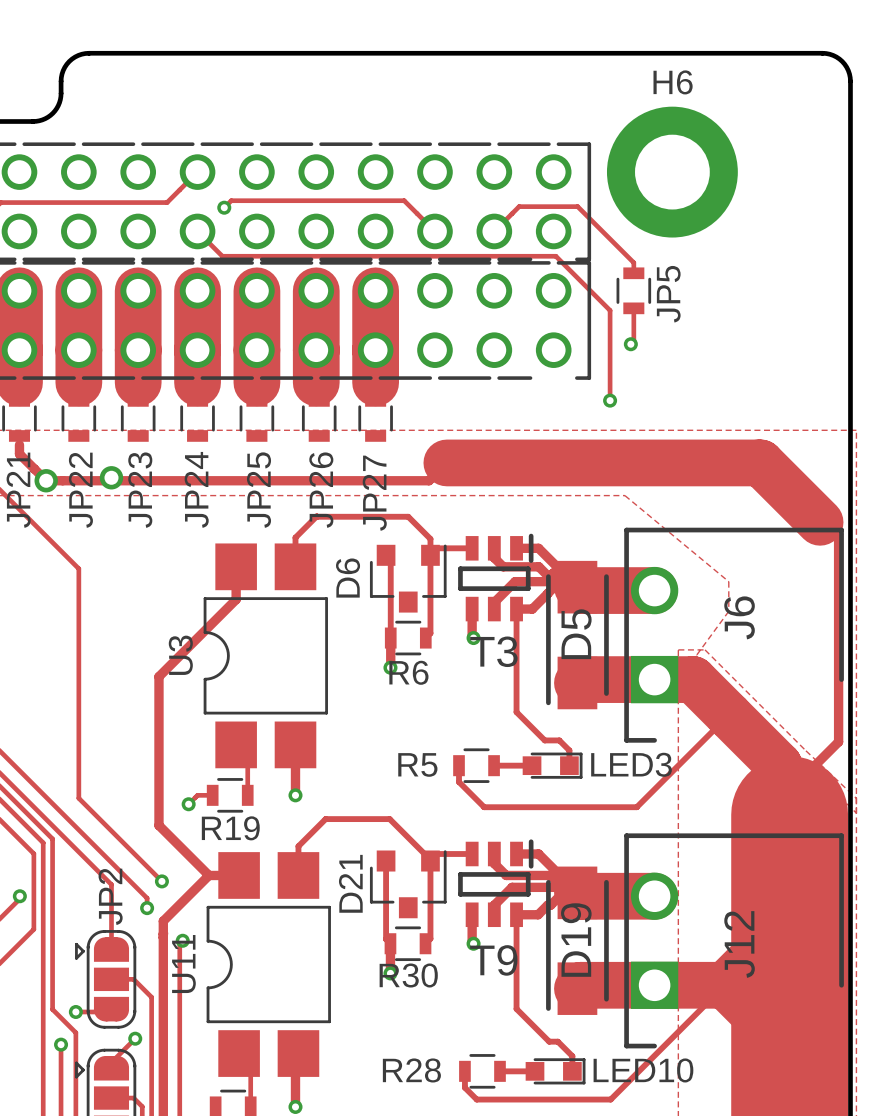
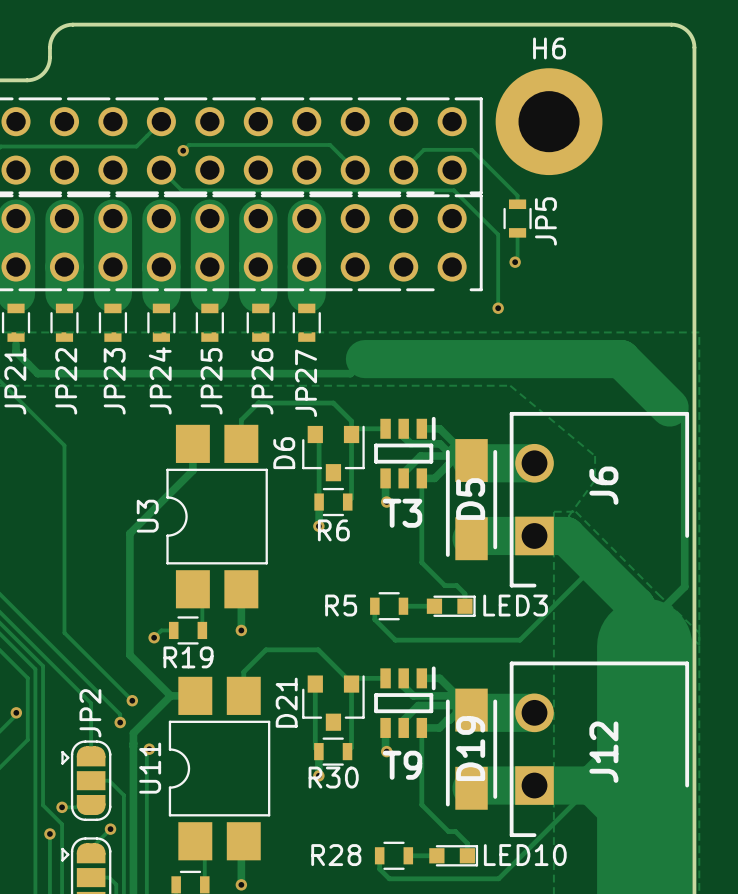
via: (111, 477) -> none
via: (46, 480) -> none

